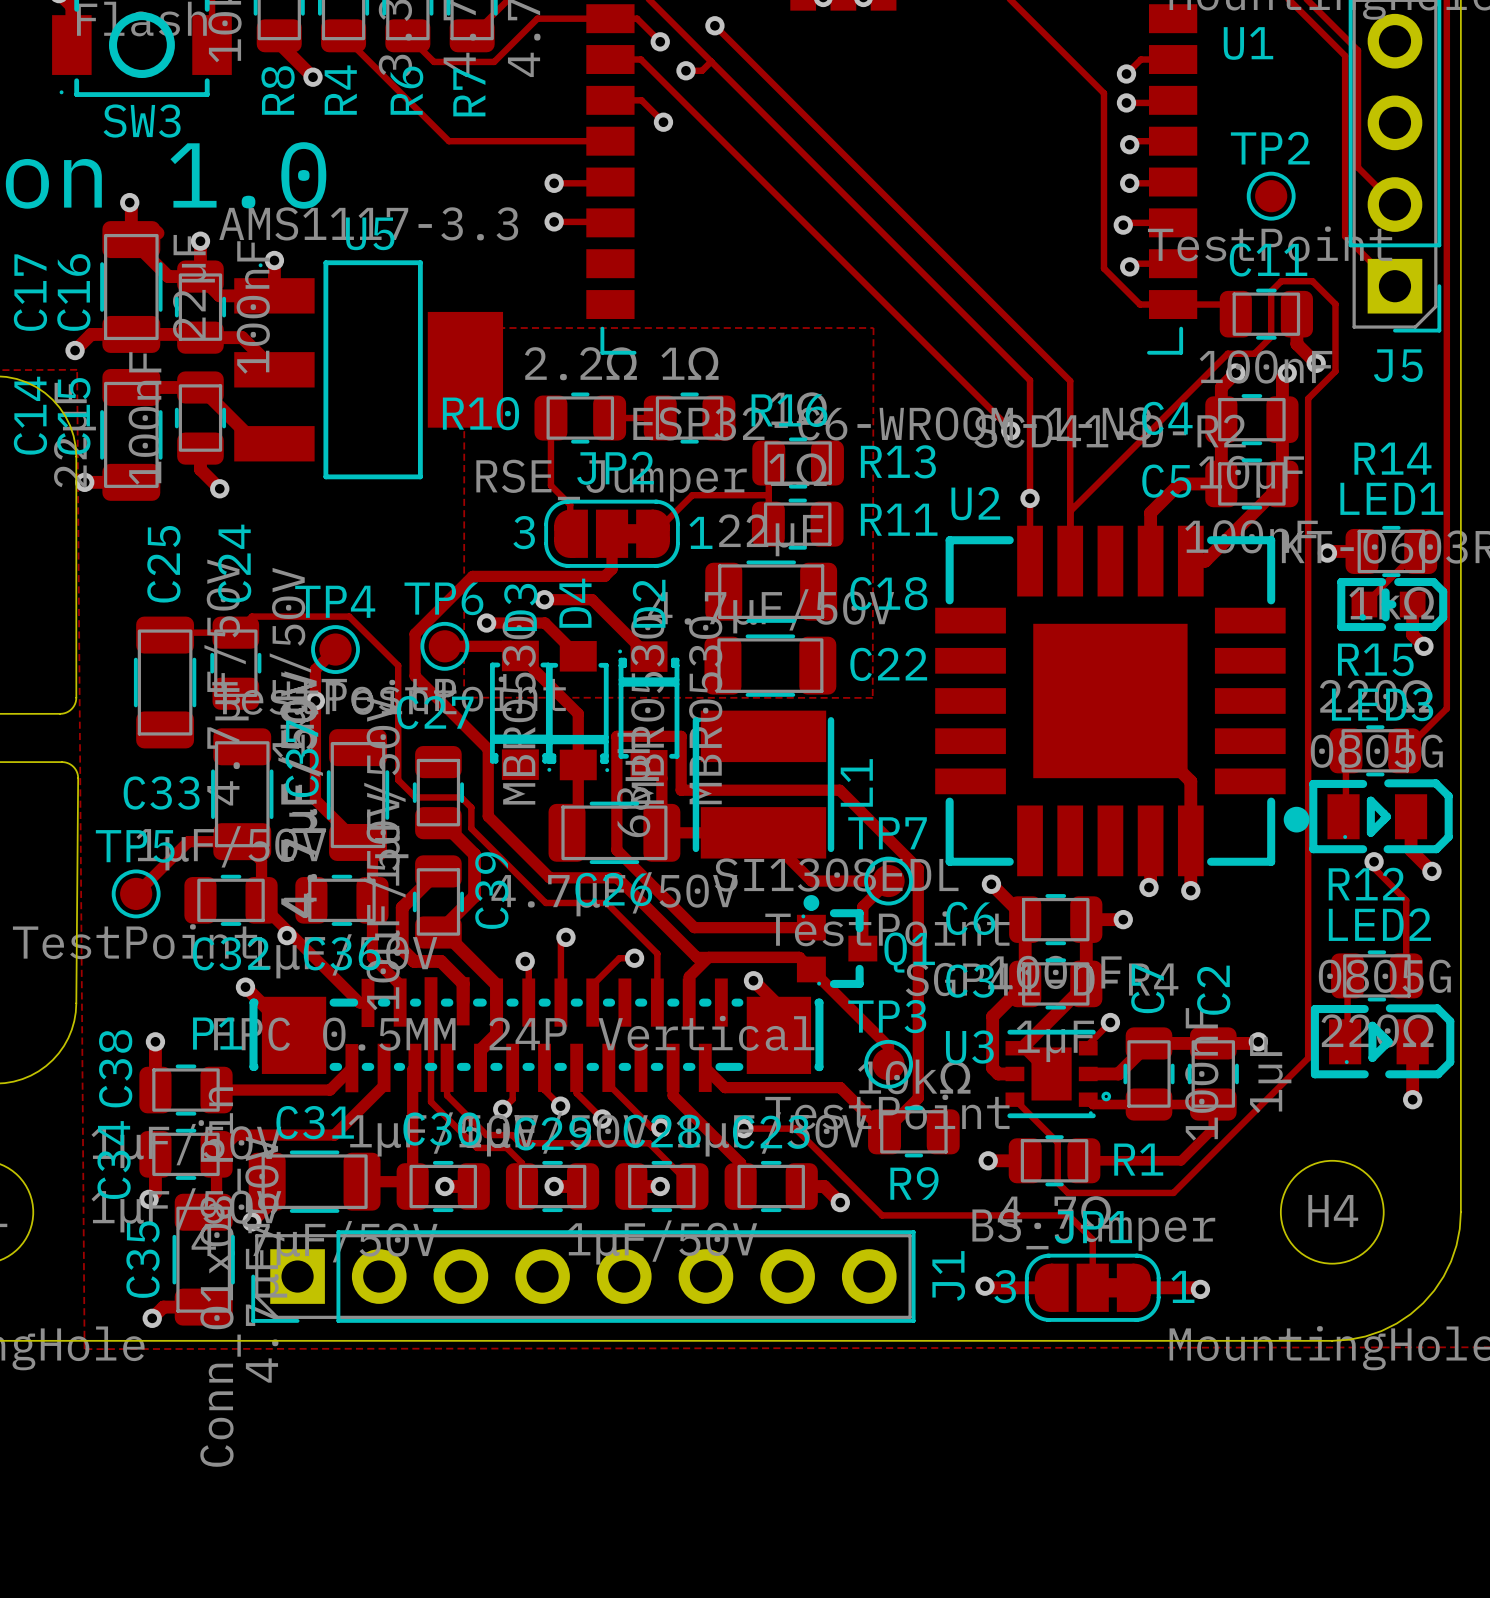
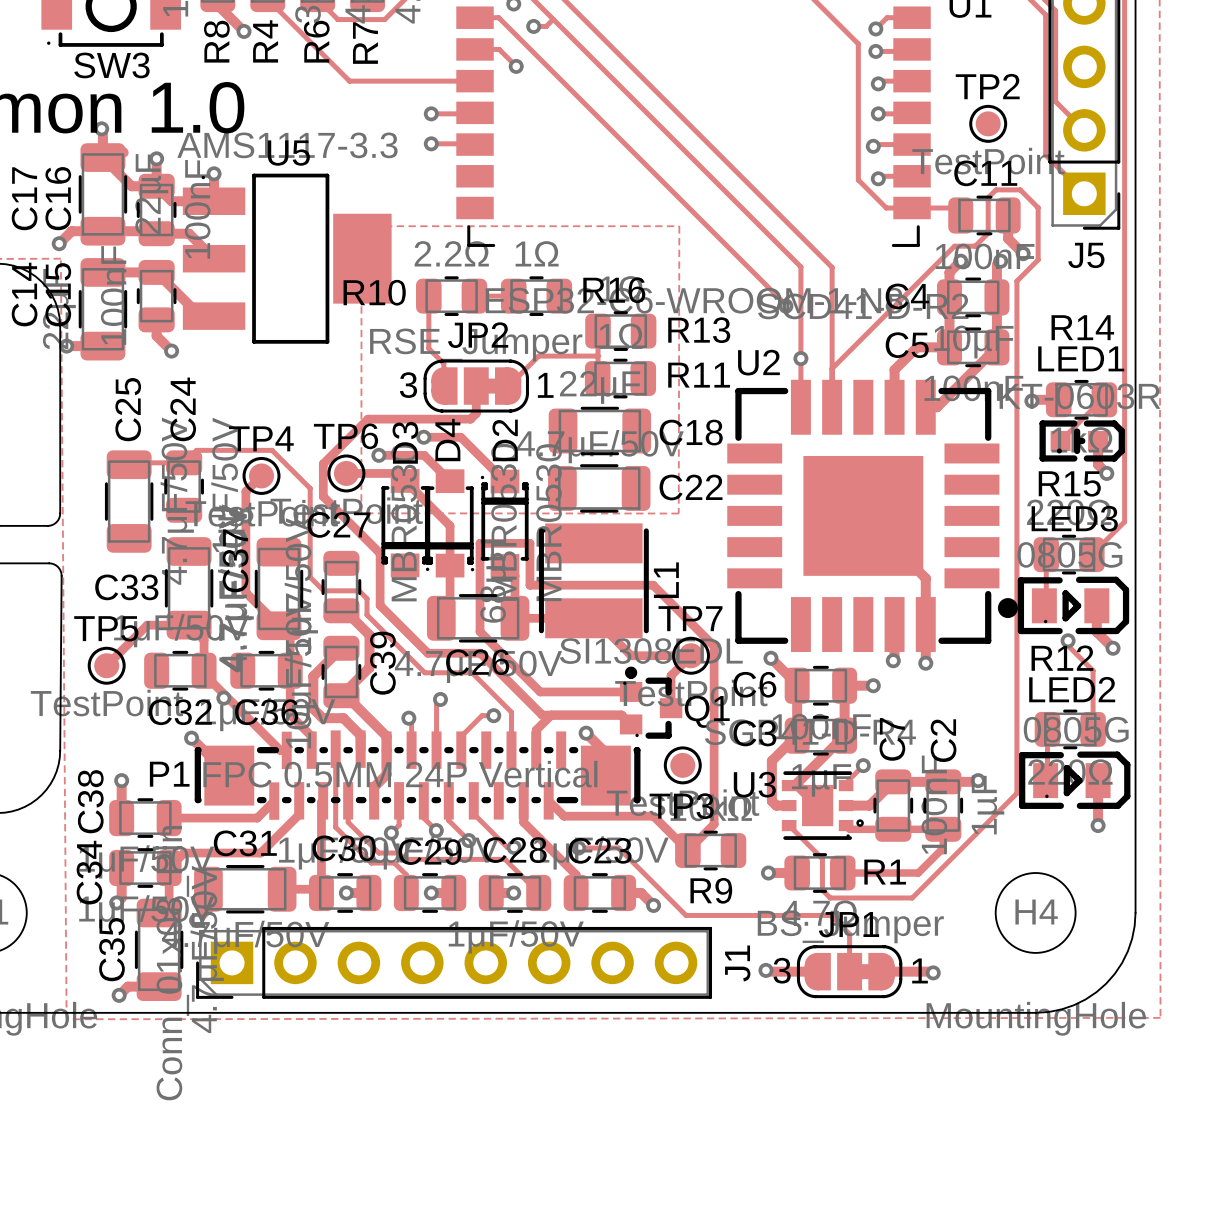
track: (811, 969) (888, 1046) (888, 1064) -> none
TP3 name position: TP3 (887, 1016) -> TP3 (681, 806)
TP3 position: (888, 1064) -> (682, 765)

